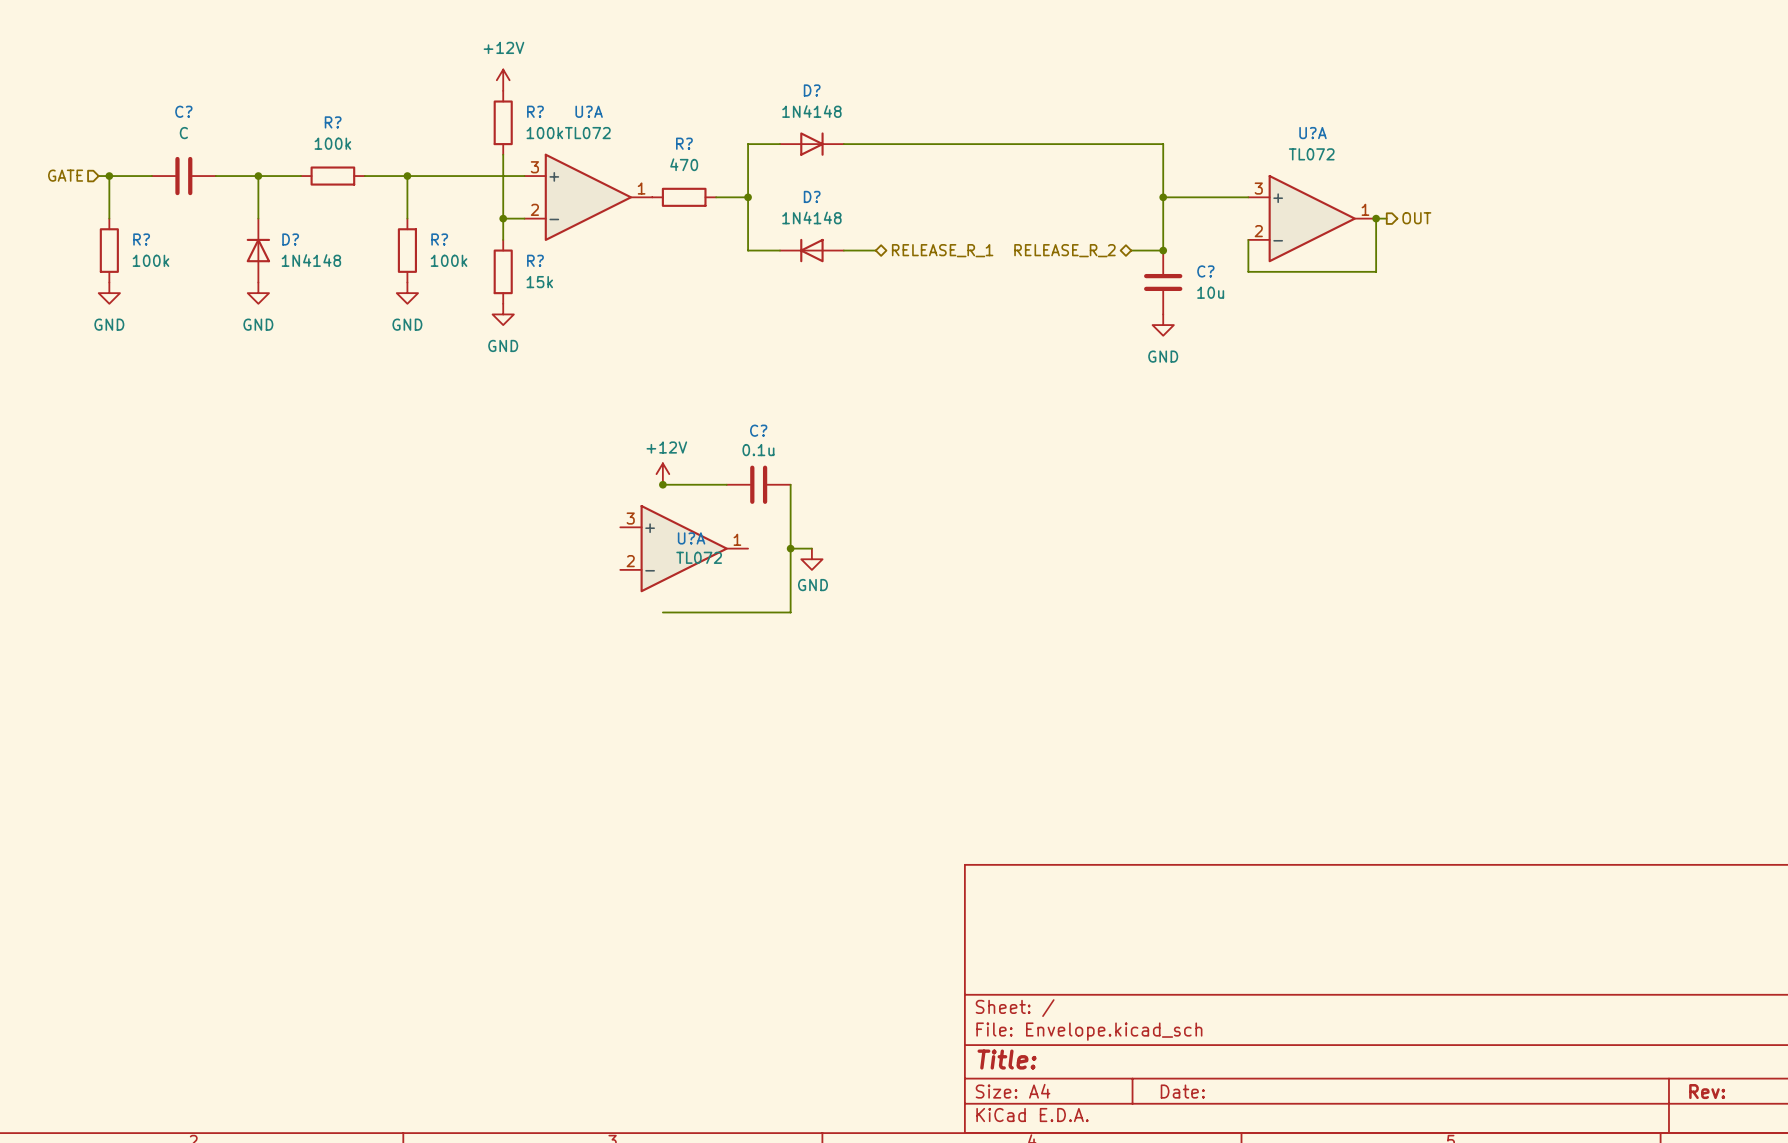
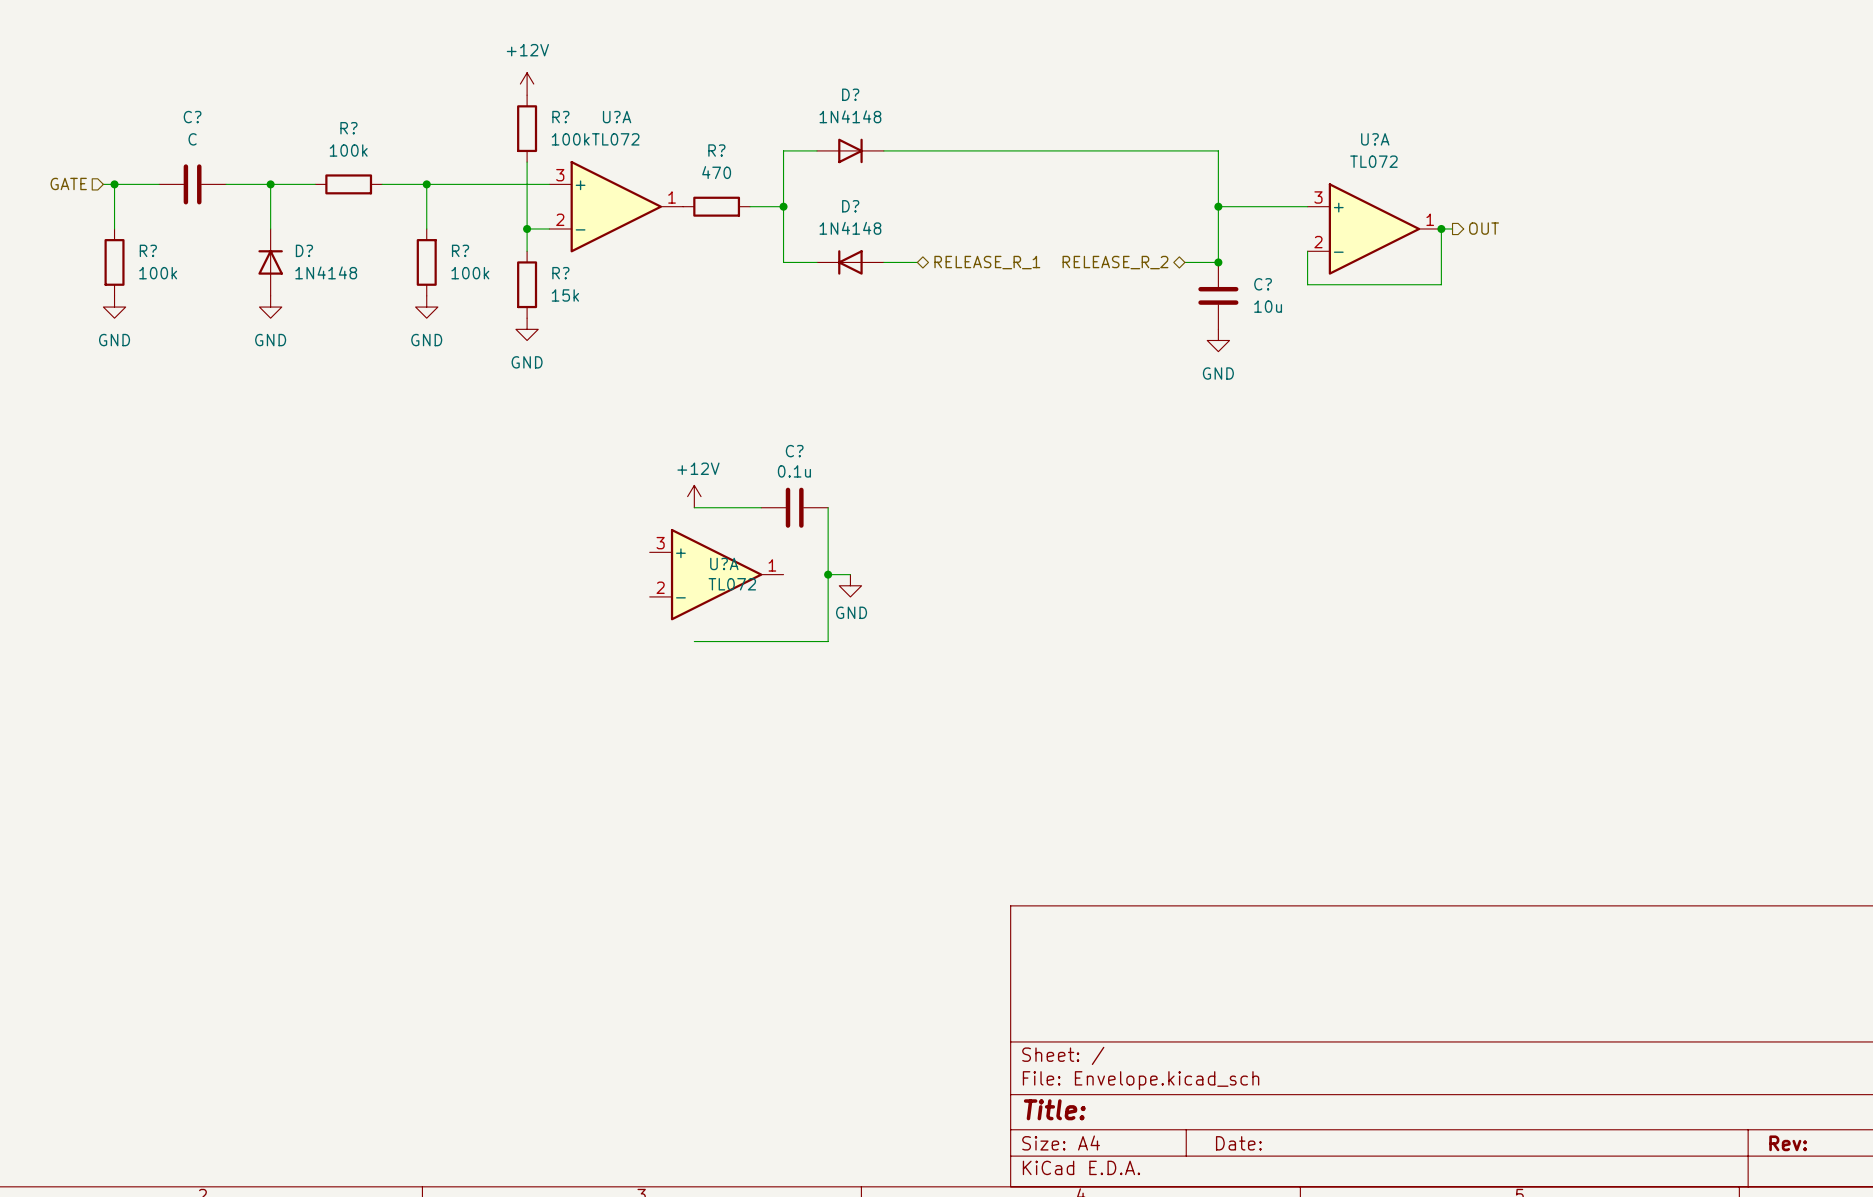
junction: (662, 484) -> none

